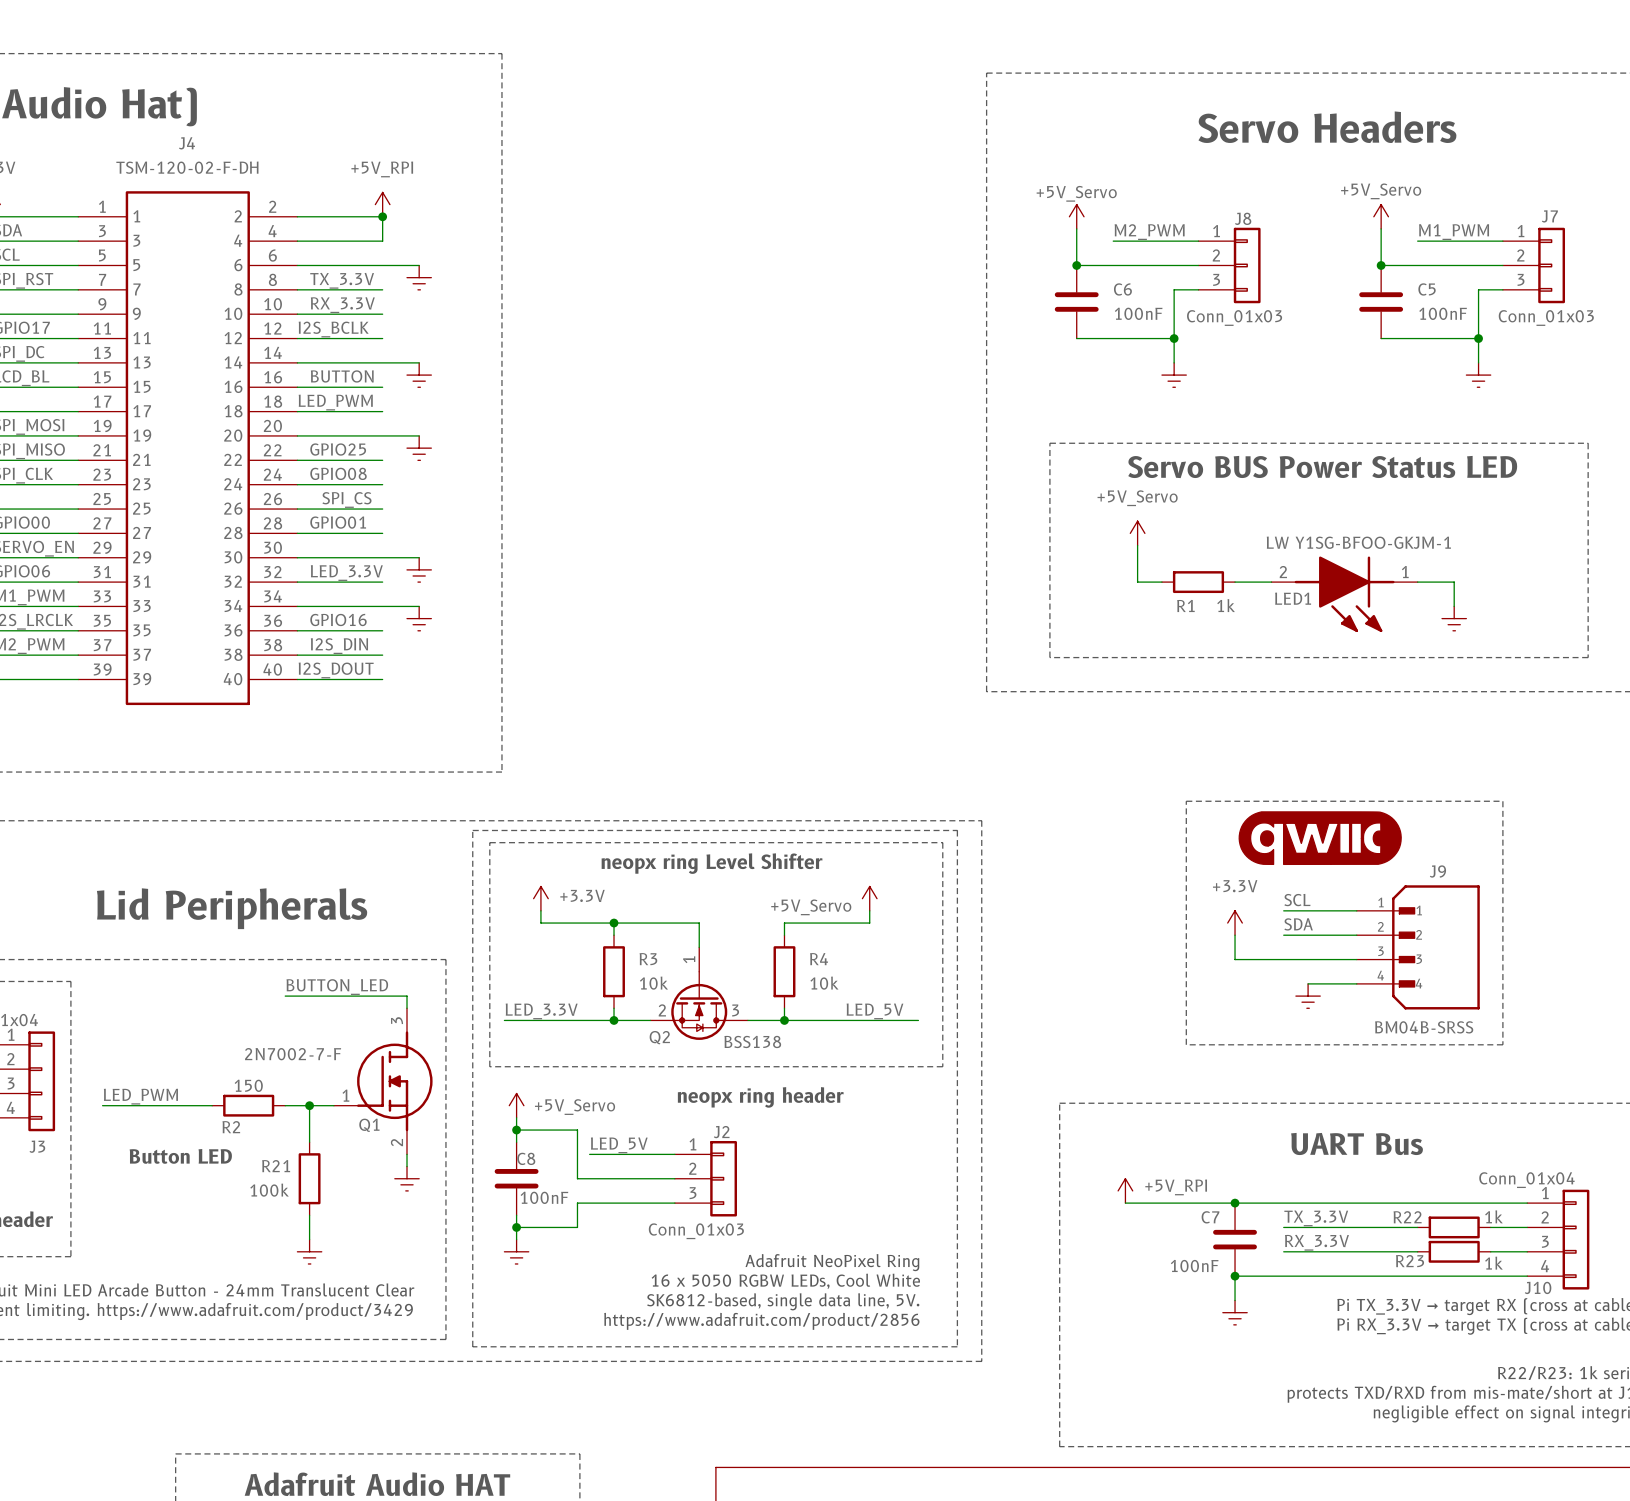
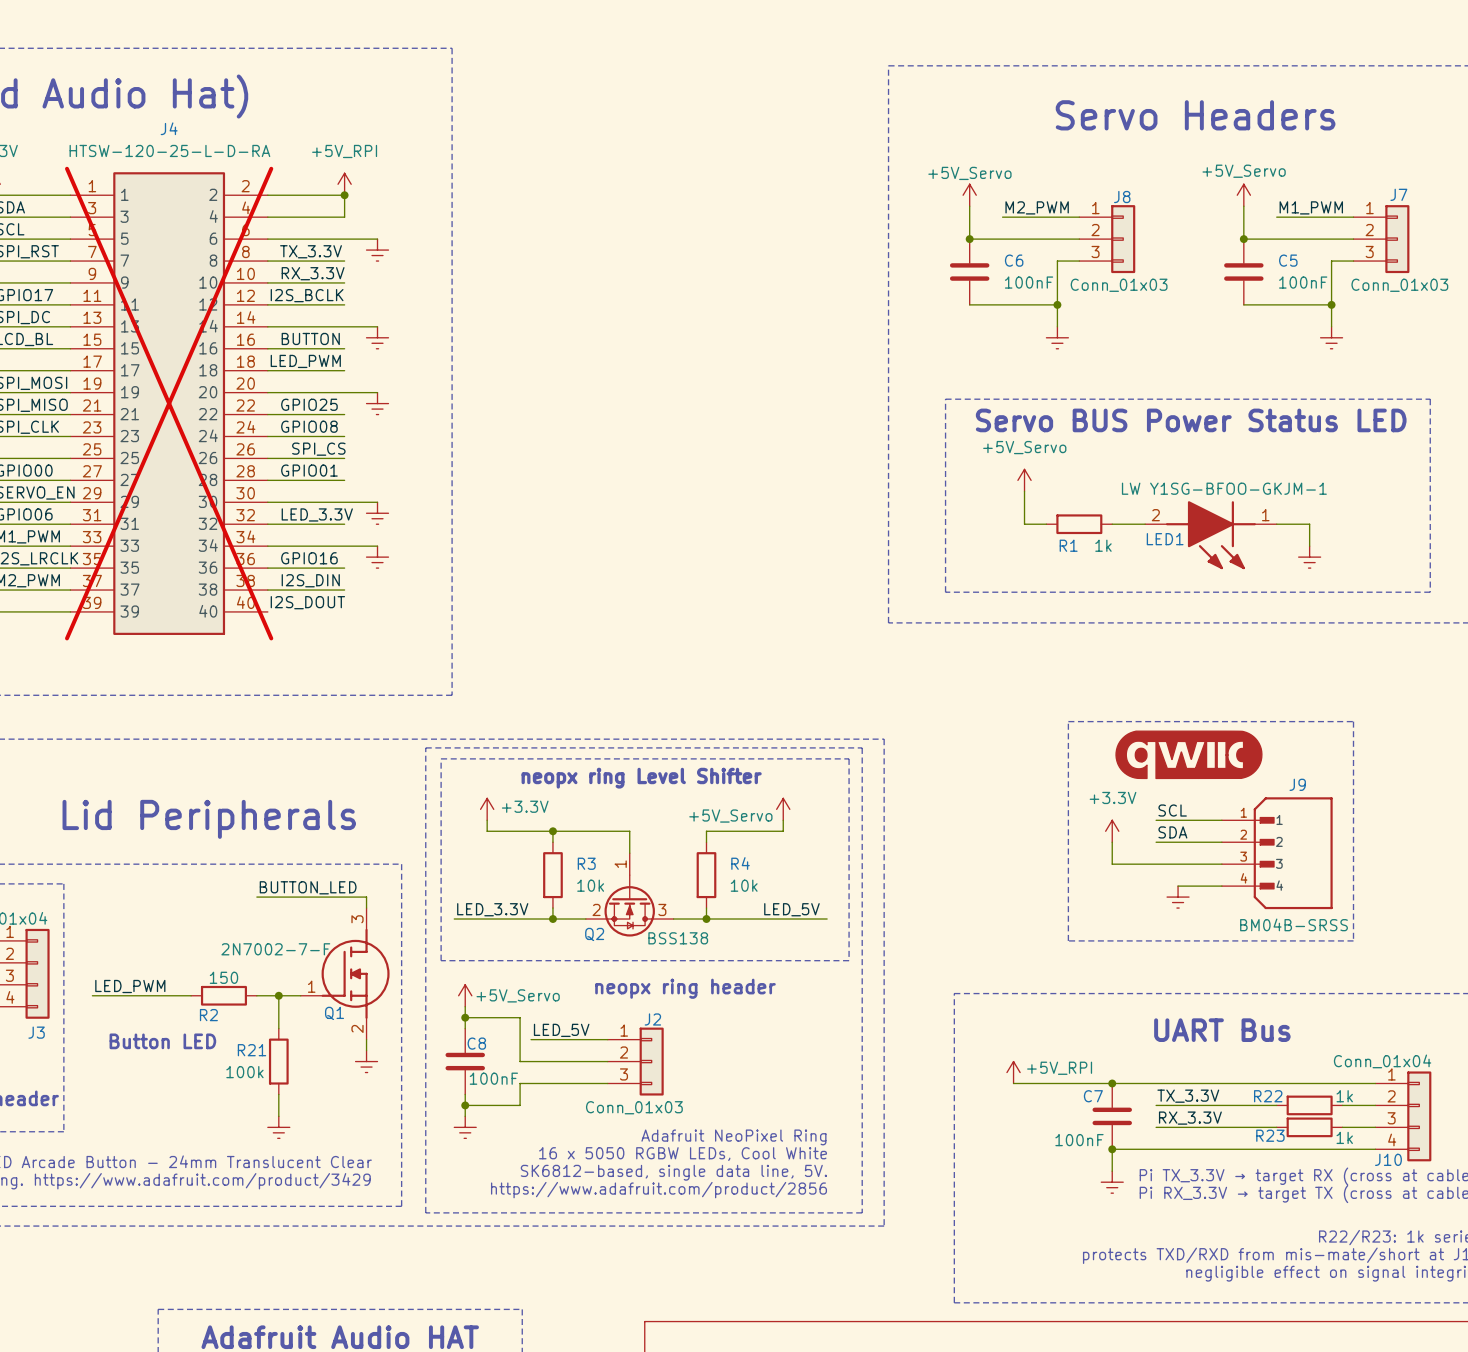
J4 value: TSM-120-02-F-DH (187, 167) -> HTSW-120-25-L-D-RA (169, 150)
J4 do-not-place cross: none -> (169, 403)
wire: (297, 679) (382, 679) -> none

